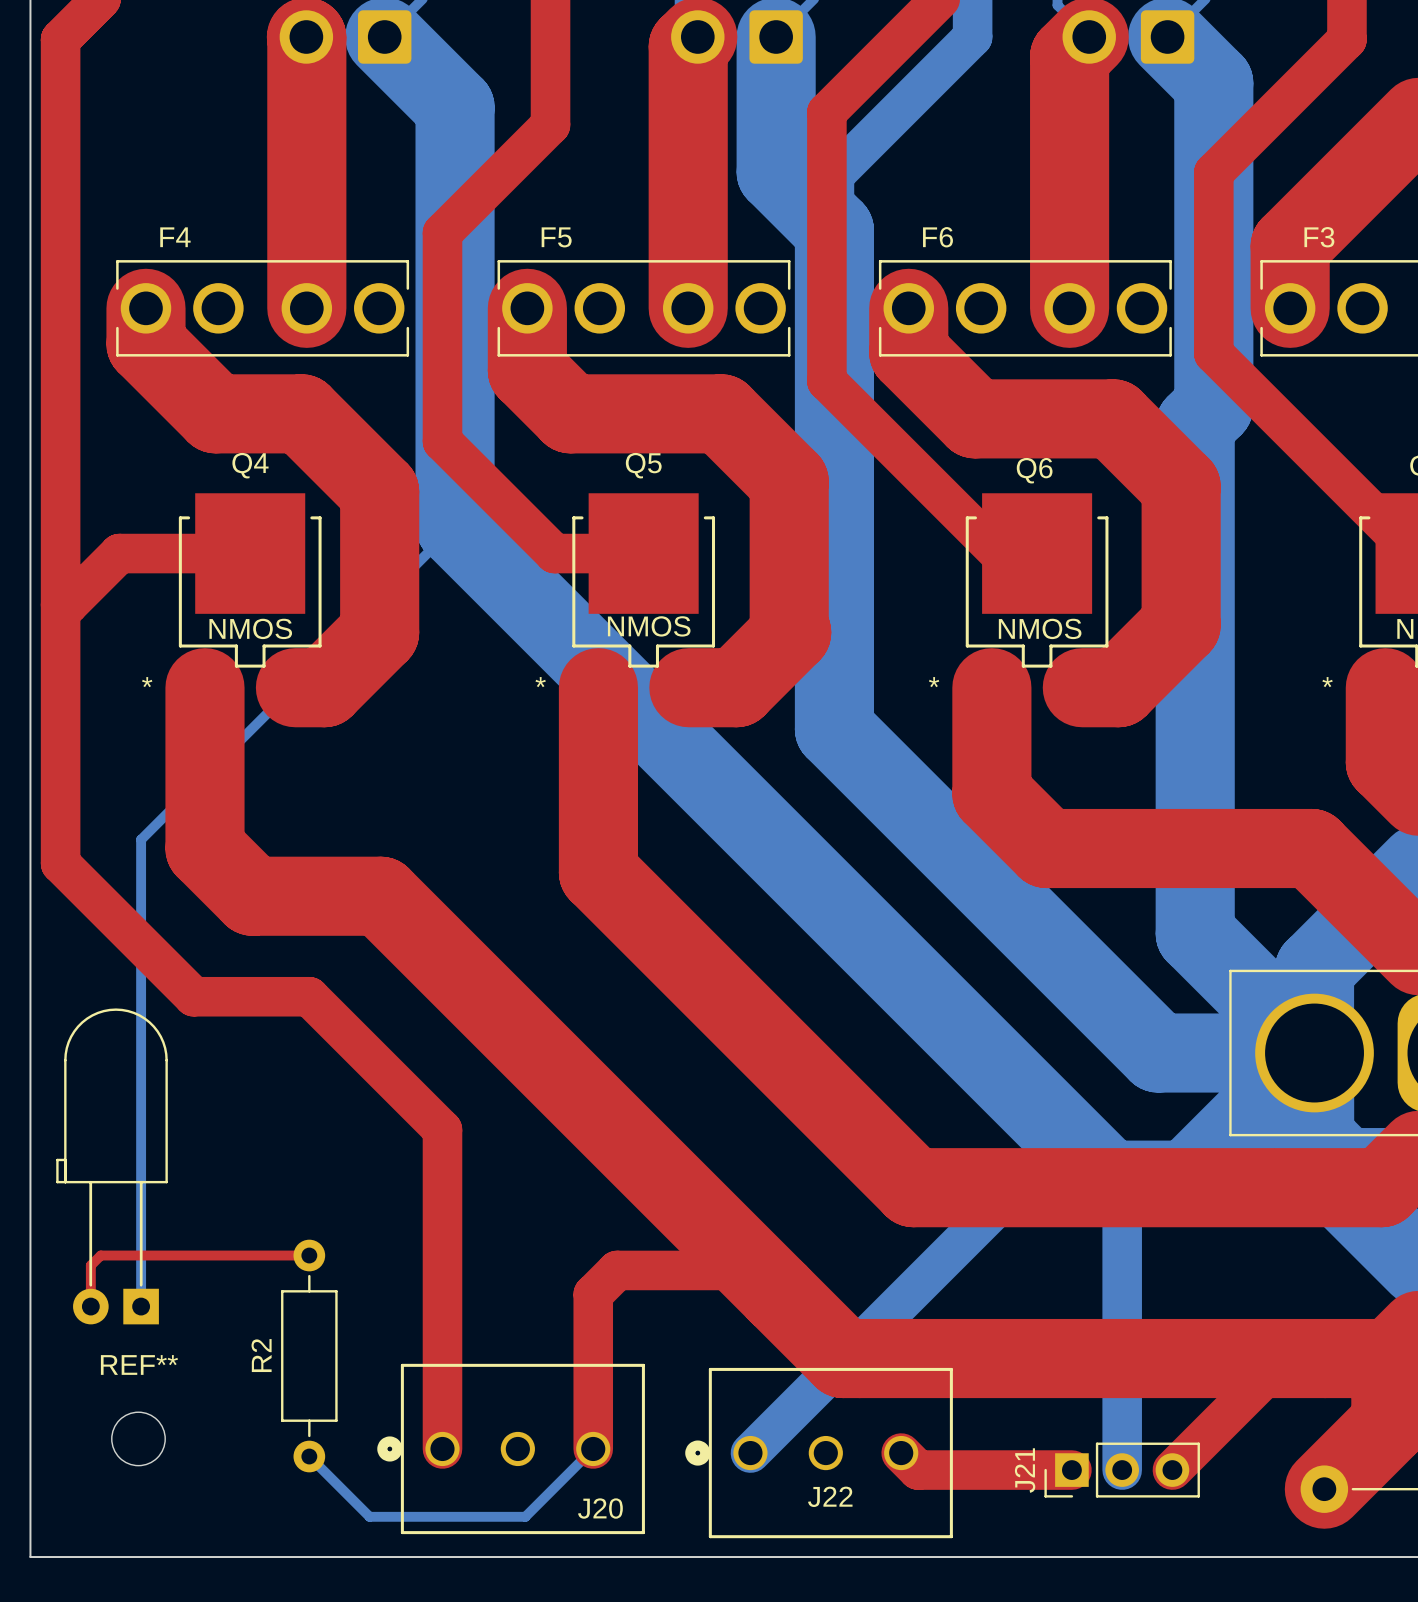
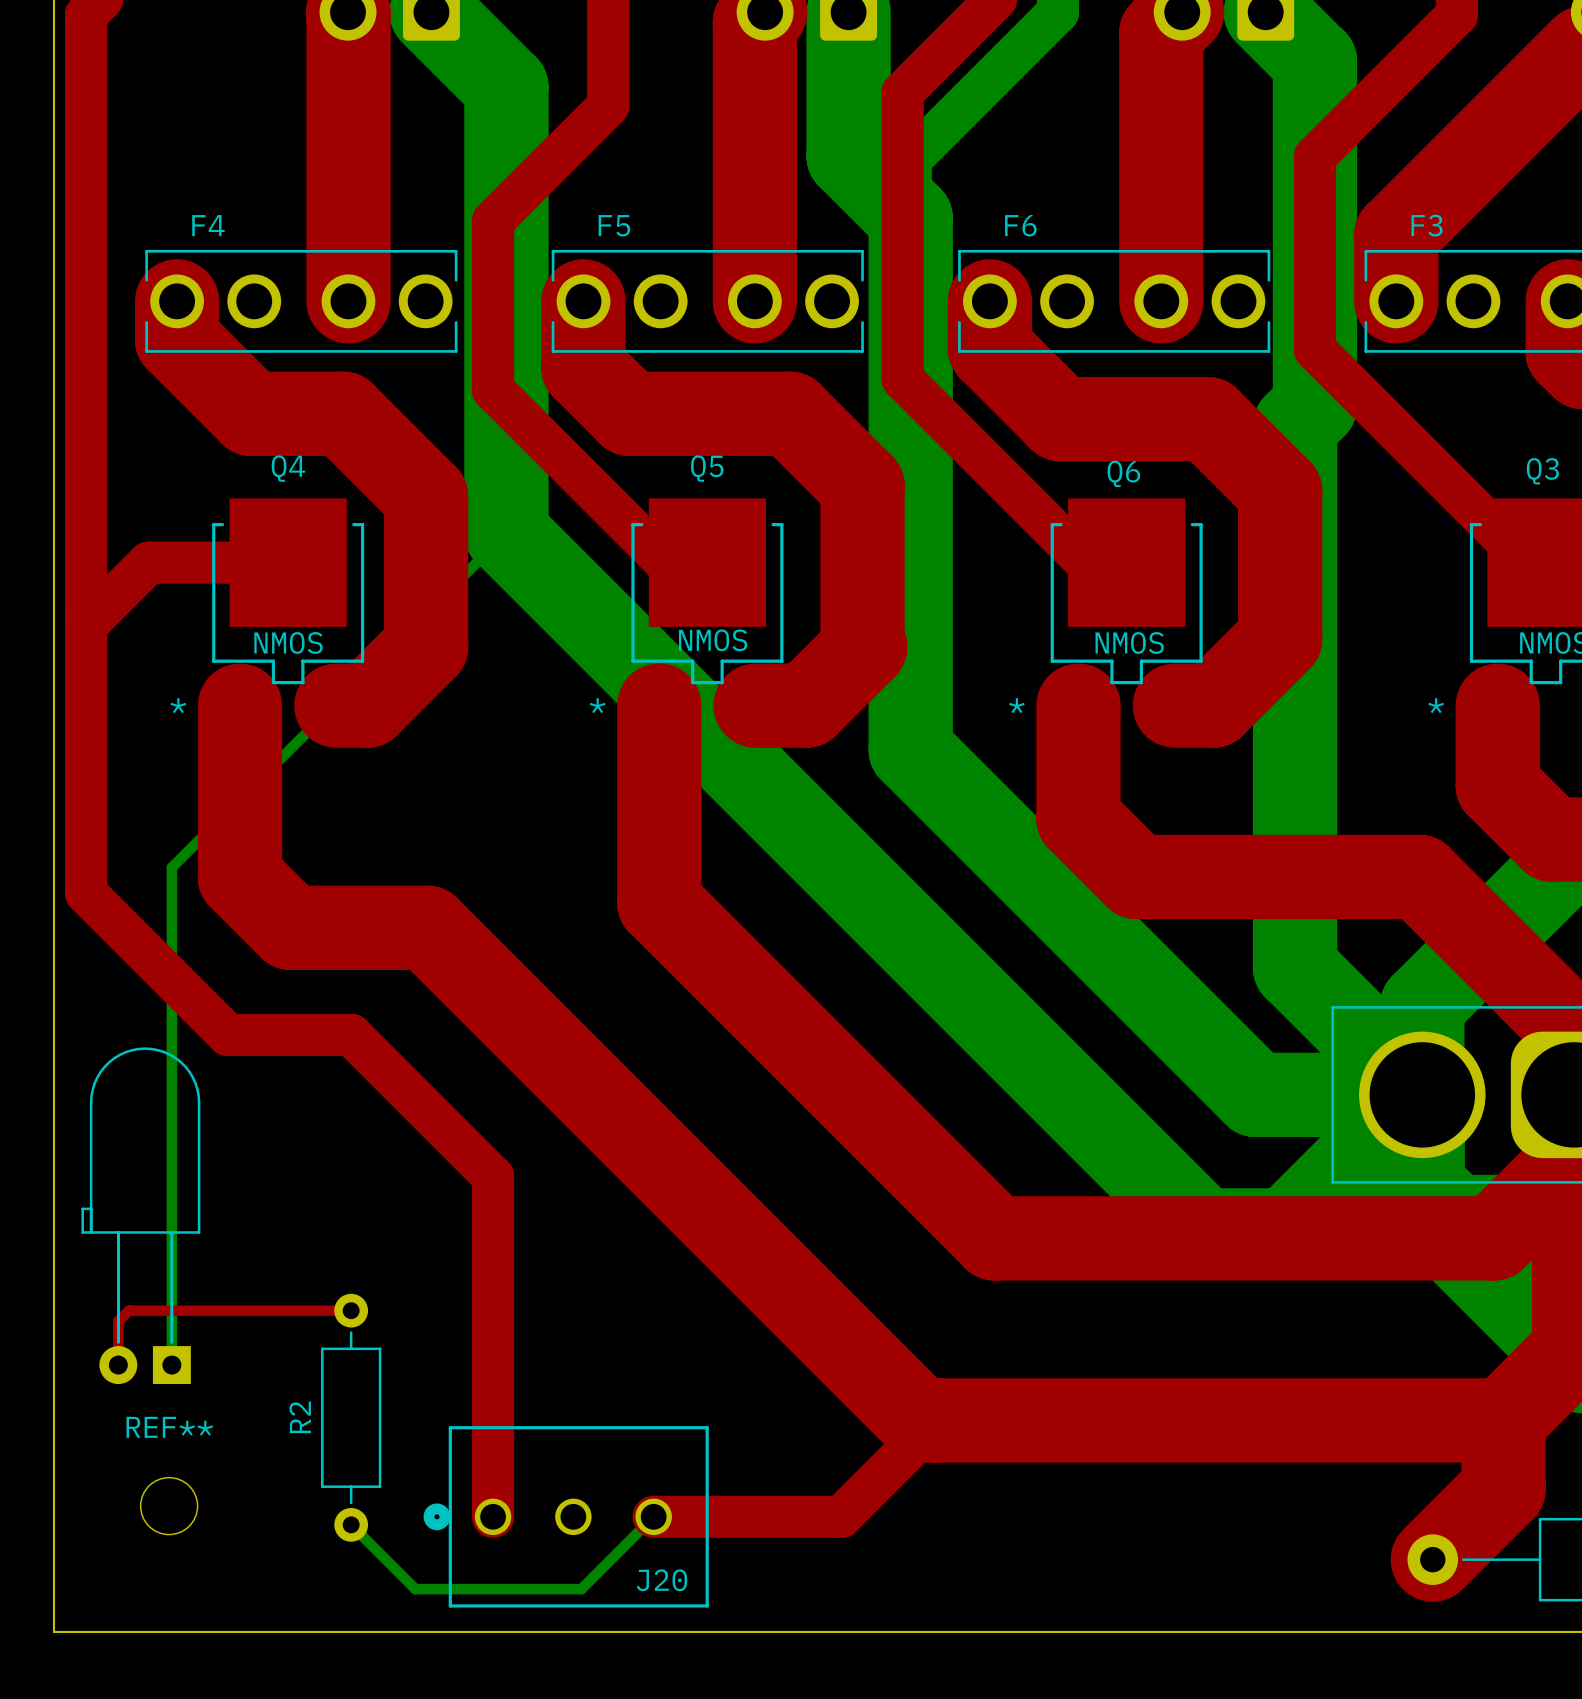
top track: (442, 391) (442, 441) (554, 553) (604, 553) -> (493, 389) (666, 562)
top track: (778, 1293) (755, 1270) (617, 1270) (593, 1294) (593, 1448) -> (937, 1420) (841, 1516) (653, 1516)
top track: (1325, 1358) (1283, 1358) (1172, 1470) -> none
bottom track: (750, 1453) (1023, 1180) (1109, 1180) (1122, 1192) (1122, 1470) -> none
J22: (819, 1453) -> none
top track: (901, 1453) (918, 1470) (1071, 1470) -> none
J21: (1122, 1470) -> none

